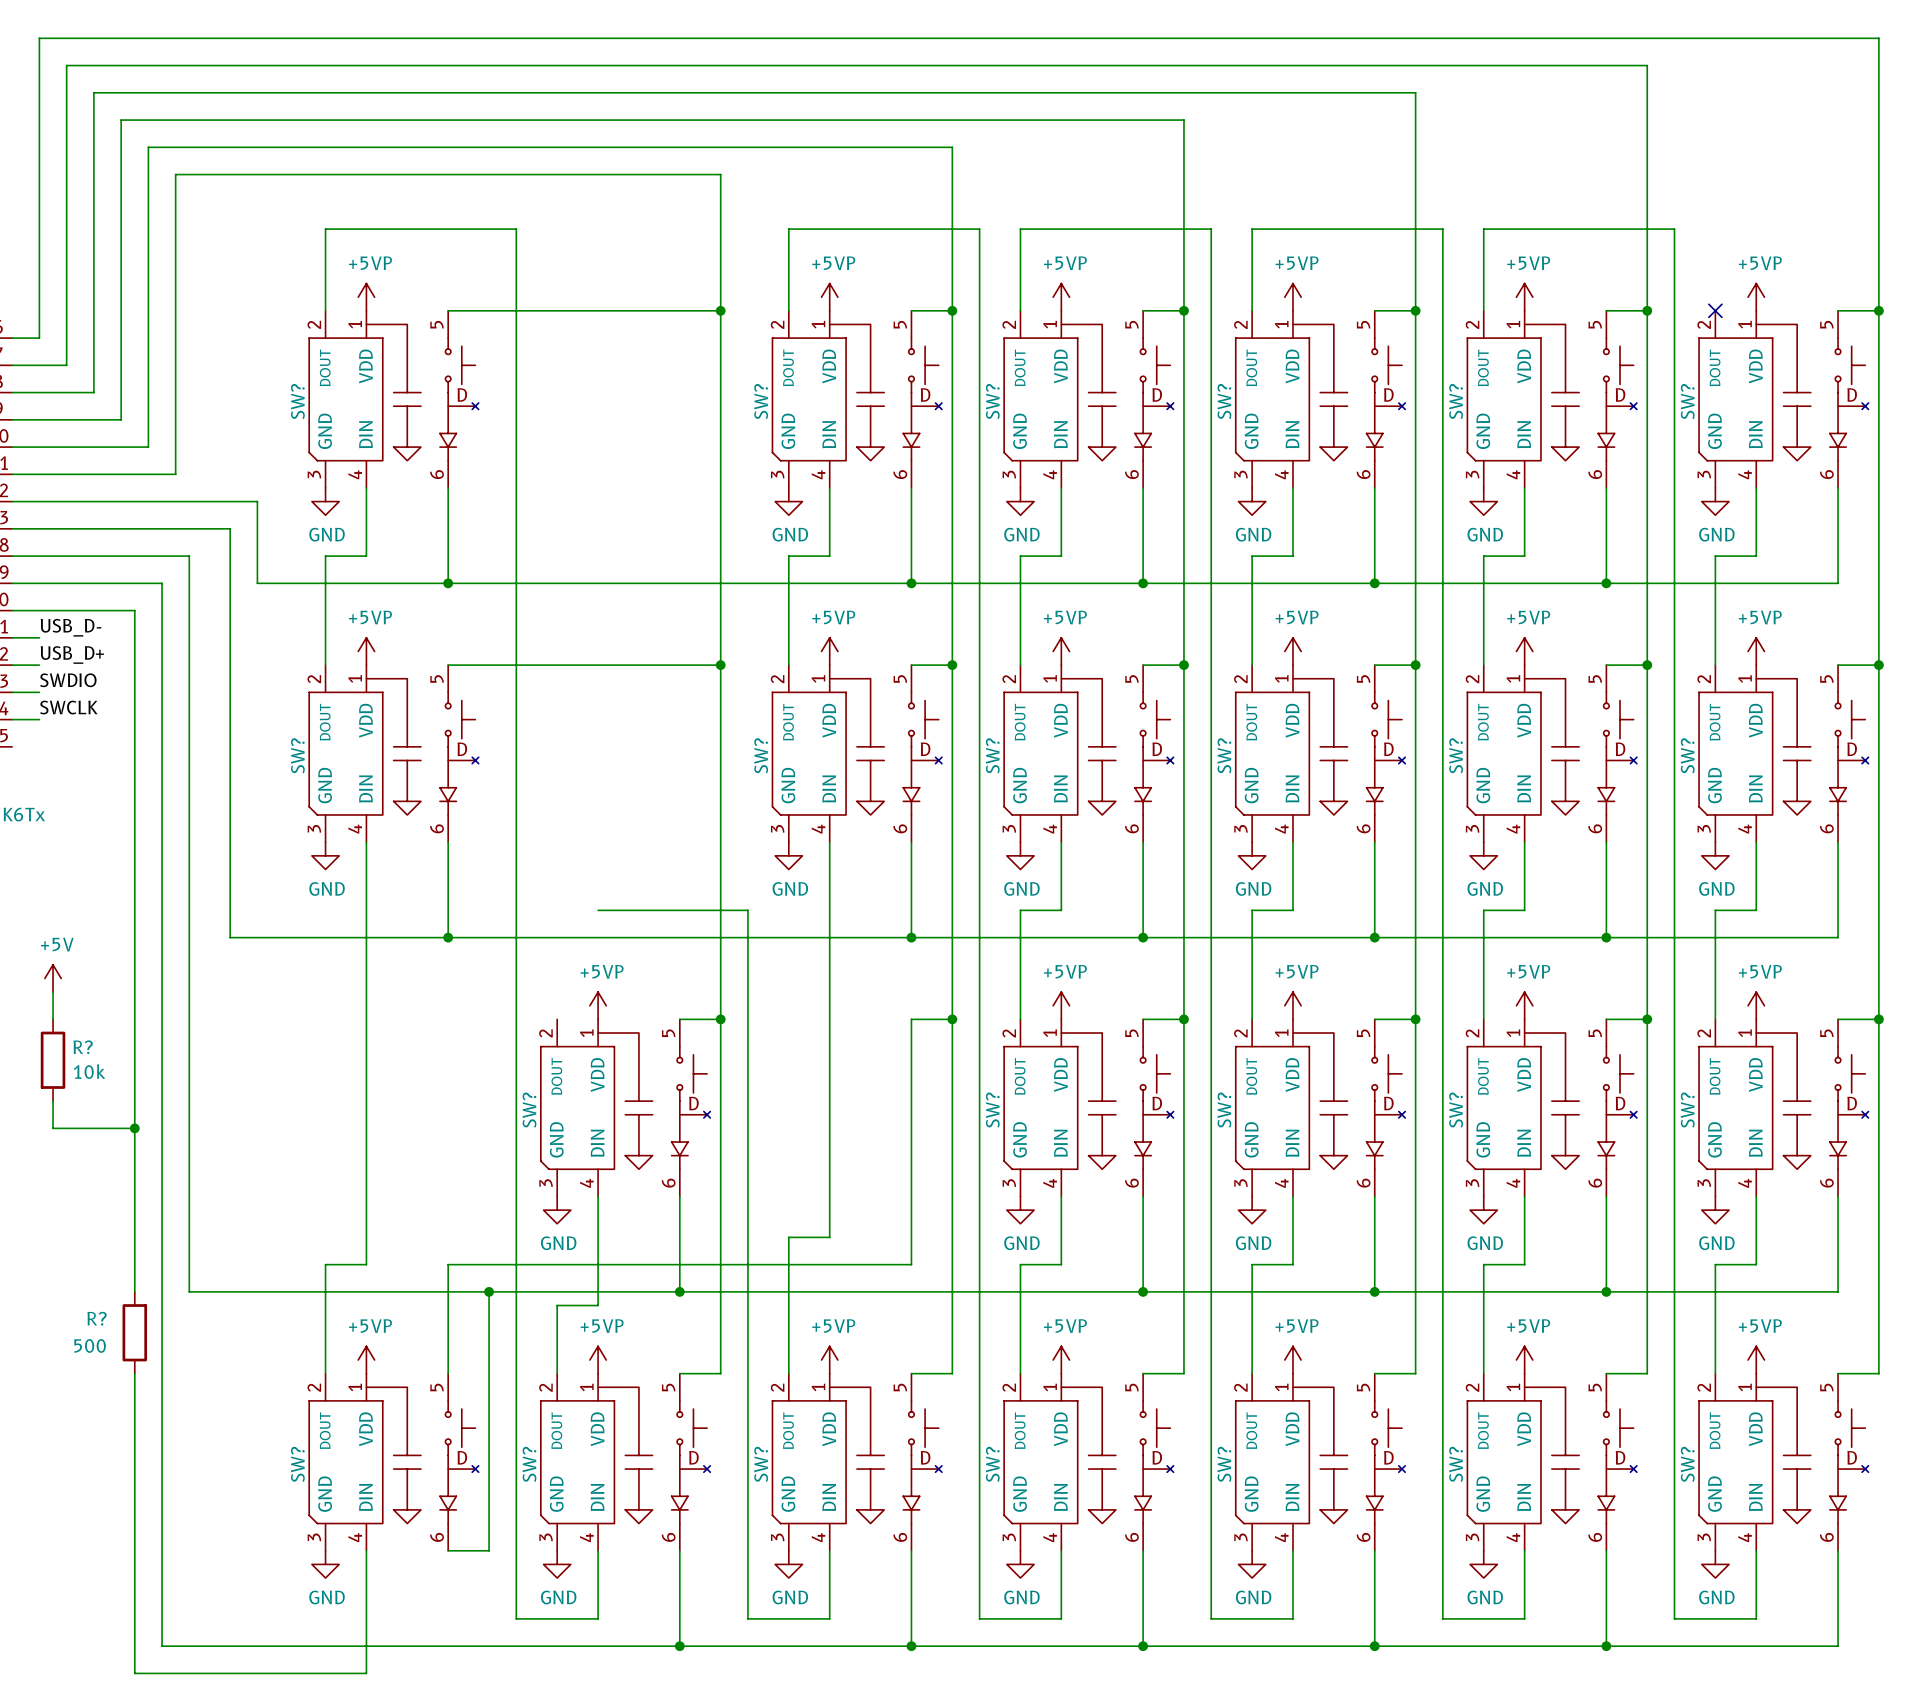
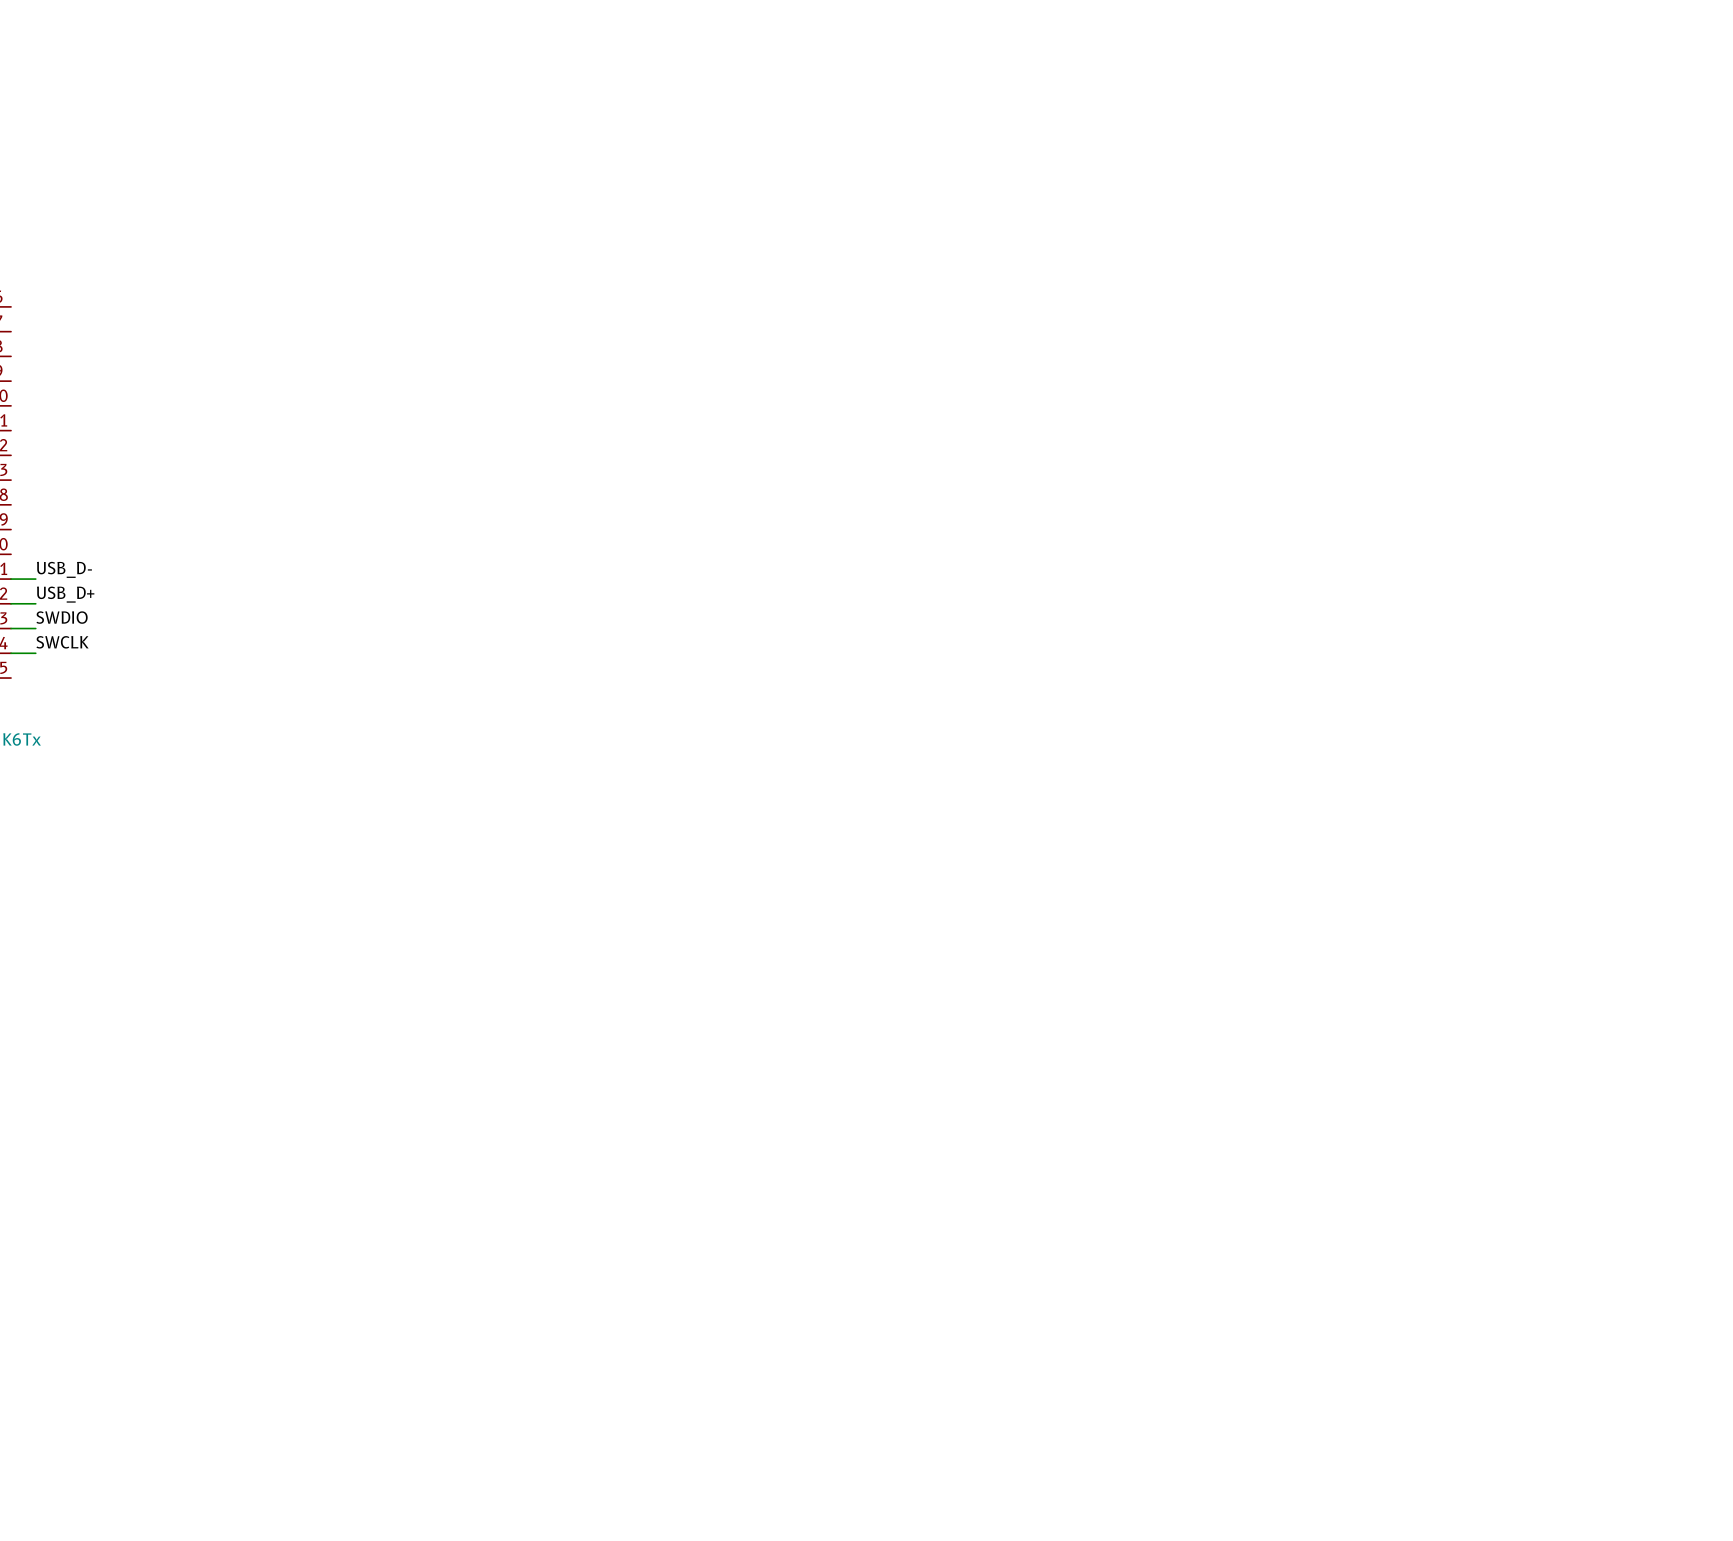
power symbol: +5VP (366, 297) -> none
power symbol: +5VP (829, 297) -> none
power symbol: +5VP (1061, 297) -> none
power symbol: +5VP (1292, 297) -> none
power symbol: +5VP (1524, 297) -> none
power symbol: +5VP (1756, 297) -> none
wire: (325, 310) (325, 229) (516, 229) (516, 1618) (598, 1618) (598, 1550) -> none
wire: (448, 310) (720, 310) -> none
junction: (720, 310) -> none
wire: (788, 310) (788, 229) (979, 229) (979, 1618) (1061, 1618) (1061, 1550) -> none
wire: (911, 310) (952, 310) -> none
junction: (952, 310) -> none
wire: (1020, 310) (1020, 229) (1211, 229) (1211, 1618) (1292, 1618) (1292, 1550) -> none
wire: (1143, 310) (1183, 310) -> none
junction: (1183, 310) -> none
wire: (1252, 310) (1252, 229) (1442, 229) (1442, 1618) (1524, 1618) (1524, 1550) -> none
wire: (1374, 310) (1415, 310) -> none
junction: (1415, 310) -> none
wire: (1483, 310) (1483, 229) (1674, 229) (1674, 1618) (1756, 1618) (1756, 1550) -> none
wire: (1606, 310) (1647, 310) -> none
junction: (1647, 310) -> none
no-connect mark: (1715, 310) -> none
wire: (1838, 310) (1878, 310) -> none
junction: (1878, 310) -> none
wire: (12, 338) (39, 338) (39, 38) (1878, 38) (1878, 1373) (1838, 1373) -> none
wire: (12, 365) (66, 365) (66, 65) (1647, 65) (1647, 1373) (1606, 1373) -> none
wire: (12, 392) (93, 392) (93, 92) (1415, 92) (1415, 1373) (1374, 1373) -> none
SW?: (393, 399) -> none
SW?: (857, 399) -> none
SW?: (1088, 399) -> none
SW?: (1320, 399) -> none
SW?: (1552, 399) -> none
SW?: (1783, 399) -> none
wire: (12, 419) (121, 419) (121, 120) (1183, 120) (1183, 1373) (1143, 1373) -> none
wire: (12, 447) (148, 447) (148, 147) (952, 147) (952, 1373) (911, 1373) -> none
wire: (12, 474) (175, 474) (175, 174) (720, 174) (720, 1373) (679, 1373) -> none
wire: (366, 487) (366, 556) (325, 556) (325, 665) -> none
wire: (448, 487) (448, 583) -> none
wire: (829, 487) (829, 556) (788, 556) (788, 665) -> none
wire: (911, 487) (911, 583) -> none
wire: (1061, 487) (1061, 556) (1020, 556) (1020, 665) -> none
wire: (1143, 487) (1143, 583) -> none
wire: (1292, 487) (1292, 556) (1252, 556) (1252, 665) -> none
wire: (1374, 487) (1374, 583) -> none
wire: (1524, 487) (1524, 556) (1483, 556) (1483, 665) -> none
wire: (1606, 487) (1606, 583) -> none
wire: (1756, 487) (1756, 556) (1715, 556) (1715, 665) -> none
wire: (1838, 487) (1838, 583) (257, 583) (257, 501) (12, 501) -> none
power symbol: GND (325, 501) -> none
power symbol: GND (788, 501) -> none
power symbol: GND (1020, 501) -> none
power symbol: GND (1252, 501) -> none
power symbol: GND (1483, 501) -> none
power symbol: GND (1715, 501) -> none
wire: (12, 528) (230, 528) (230, 937) (1838, 937) (1838, 842) -> none
wire: (12, 556) (189, 556) (189, 1291) (1838, 1291) (1838, 1196) -> none
wire: (12, 583) (162, 583) (162, 1646) (1838, 1646) (1838, 1550) -> none
junction: (448, 583) -> none
junction: (911, 583) -> none
junction: (1143, 583) -> none
junction: (1374, 583) -> none
junction: (1606, 583) -> none
wire: (12, 610) (134, 610) (134, 1291) -> none
power symbol: +5VP (366, 651) -> none
power symbol: +5VP (829, 651) -> none
power symbol: +5VP (1061, 651) -> none
power symbol: +5VP (1292, 651) -> none
power symbol: +5VP (1524, 651) -> none
power symbol: +5VP (1756, 651) -> none
wire: (448, 665) (720, 665) -> none
junction: (720, 665) -> none
wire: (911, 665) (952, 665) -> none
junction: (952, 665) -> none
wire: (1143, 665) (1183, 665) -> none
junction: (1183, 665) -> none
wire: (1374, 665) (1415, 665) -> none
junction: (1415, 665) -> none
wire: (1606, 665) (1647, 665) -> none
junction: (1647, 665) -> none
wire: (1838, 665) (1878, 665) -> none
junction: (1878, 665) -> none
SW?: (393, 753) -> none
SW?: (857, 753) -> none
SW?: (1088, 753) -> none
SW?: (1320, 753) -> none
SW?: (1552, 753) -> none
SW?: (1783, 753) -> none
wire: (366, 842) (366, 1264) (325, 1264) (325, 1373) -> none
wire: (448, 842) (448, 937) -> none
wire: (829, 842) (829, 1237) (788, 1237) (788, 1373) -> none
wire: (911, 842) (911, 937) -> none
wire: (1061, 842) (1061, 910) (1020, 910) (1020, 1019) -> none
wire: (1143, 842) (1143, 937) -> none
wire: (1292, 842) (1292, 910) (1252, 910) (1252, 1019) -> none
wire: (1374, 842) (1374, 937) -> none
wire: (1524, 842) (1524, 910) (1483, 910) (1483, 1019) -> none
wire: (1606, 842) (1606, 937) -> none
wire: (1756, 842) (1756, 910) (1715, 910) (1715, 1019) -> none
power symbol: GND (325, 855) -> none
power symbol: GND (788, 855) -> none
power symbol: GND (1020, 855) -> none
power symbol: GND (1252, 855) -> none
power symbol: GND (1483, 855) -> none
power symbol: GND (1715, 855) -> none
wire: (598, 910) (747, 910) (747, 1618) (829, 1618) (829, 1550) -> none
junction: (448, 937) -> none
junction: (911, 937) -> none
junction: (1143, 937) -> none
junction: (1374, 937) -> none
junction: (1606, 937) -> none
power symbol: +5V (53, 978) -> none
wire: (53, 992) (53, 1019) -> none
power symbol: +5VP (598, 1005) -> none
power symbol: +5VP (1061, 1005) -> none
power symbol: +5VP (1292, 1005) -> none
power symbol: +5VP (1524, 1005) -> none
power symbol: +5VP (1756, 1005) -> none
wire: (679, 1019) (720, 1019) -> none
junction: (720, 1019) -> none
wire: (952, 1019) (911, 1019) (911, 1264) (448, 1264) (448, 1373) -> none
junction: (952, 1019) -> none
wire: (1143, 1019) (1183, 1019) -> none
junction: (1183, 1019) -> none
wire: (1374, 1019) (1415, 1019) -> none
junction: (1415, 1019) -> none
wire: (1606, 1019) (1647, 1019) -> none
junction: (1647, 1019) -> none
wire: (1838, 1019) (1878, 1019) -> none
junction: (1878, 1019) -> none
R?: 10k (53, 1060) -> none
wire: (53, 1101) (53, 1128) (134, 1128) -> none
SW?: (625, 1107) -> none
SW?: (1088, 1107) -> none
SW?: (1320, 1107) -> none
SW?: (1552, 1107) -> none
SW?: (1783, 1107) -> none
junction: (134, 1128) -> none
wire: (598, 1196) (598, 1305) (557, 1305) (557, 1373) -> none
wire: (679, 1196) (679, 1291) -> none
wire: (1061, 1196) (1061, 1264) (1020, 1264) (1020, 1373) -> none
wire: (1143, 1196) (1143, 1291) -> none
wire: (1292, 1196) (1292, 1264) (1252, 1264) (1252, 1373) -> none
wire: (1374, 1196) (1374, 1291) -> none
wire: (1524, 1196) (1524, 1264) (1483, 1264) (1483, 1373) -> none
wire: (1606, 1196) (1606, 1291) -> none
wire: (1756, 1196) (1756, 1264) (1715, 1264) (1715, 1373) -> none
power symbol: GND (557, 1210) -> none
power symbol: GND (1020, 1210) -> none
power symbol: GND (1252, 1210) -> none
power symbol: GND (1483, 1210) -> none
power symbol: GND (1715, 1210) -> none
wire: (489, 1291) (489, 1550) (448, 1550) -> none
junction: (489, 1291) -> none
junction: (679, 1291) -> none
junction: (1143, 1291) -> none
junction: (1374, 1291) -> none
junction: (1606, 1291) -> none
R?: 500 (134, 1332) -> none
power symbol: +5VP (366, 1360) -> none
power symbol: +5VP (598, 1360) -> none
power symbol: +5VP (829, 1360) -> none
power symbol: +5VP (1061, 1360) -> none
power symbol: +5VP (1292, 1360) -> none
power symbol: +5VP (1524, 1360) -> none
power symbol: +5VP (1756, 1360) -> none
wire: (134, 1373) (134, 1673) (366, 1673) (366, 1550) -> none
SW?: (393, 1462) -> none
SW?: (625, 1462) -> none
SW?: (857, 1462) -> none
SW?: (1088, 1462) -> none
SW?: (1320, 1462) -> none
SW?: (1552, 1462) -> none
SW?: (1783, 1462) -> none
wire: (679, 1550) (679, 1646) -> none
wire: (911, 1550) (911, 1646) -> none
wire: (1143, 1550) (1143, 1646) -> none
wire: (1374, 1550) (1374, 1646) -> none
wire: (1606, 1550) (1606, 1646) -> none
power symbol: GND (325, 1564) -> none
power symbol: GND (557, 1564) -> none
power symbol: GND (788, 1564) -> none
power symbol: GND (1020, 1564) -> none
power symbol: GND (1252, 1564) -> none
power symbol: GND (1483, 1564) -> none
power symbol: GND (1715, 1564) -> none
junction: (679, 1646) -> none
junction: (911, 1646) -> none
junction: (1143, 1646) -> none
junction: (1374, 1646) -> none
junction: (1606, 1646) -> none

